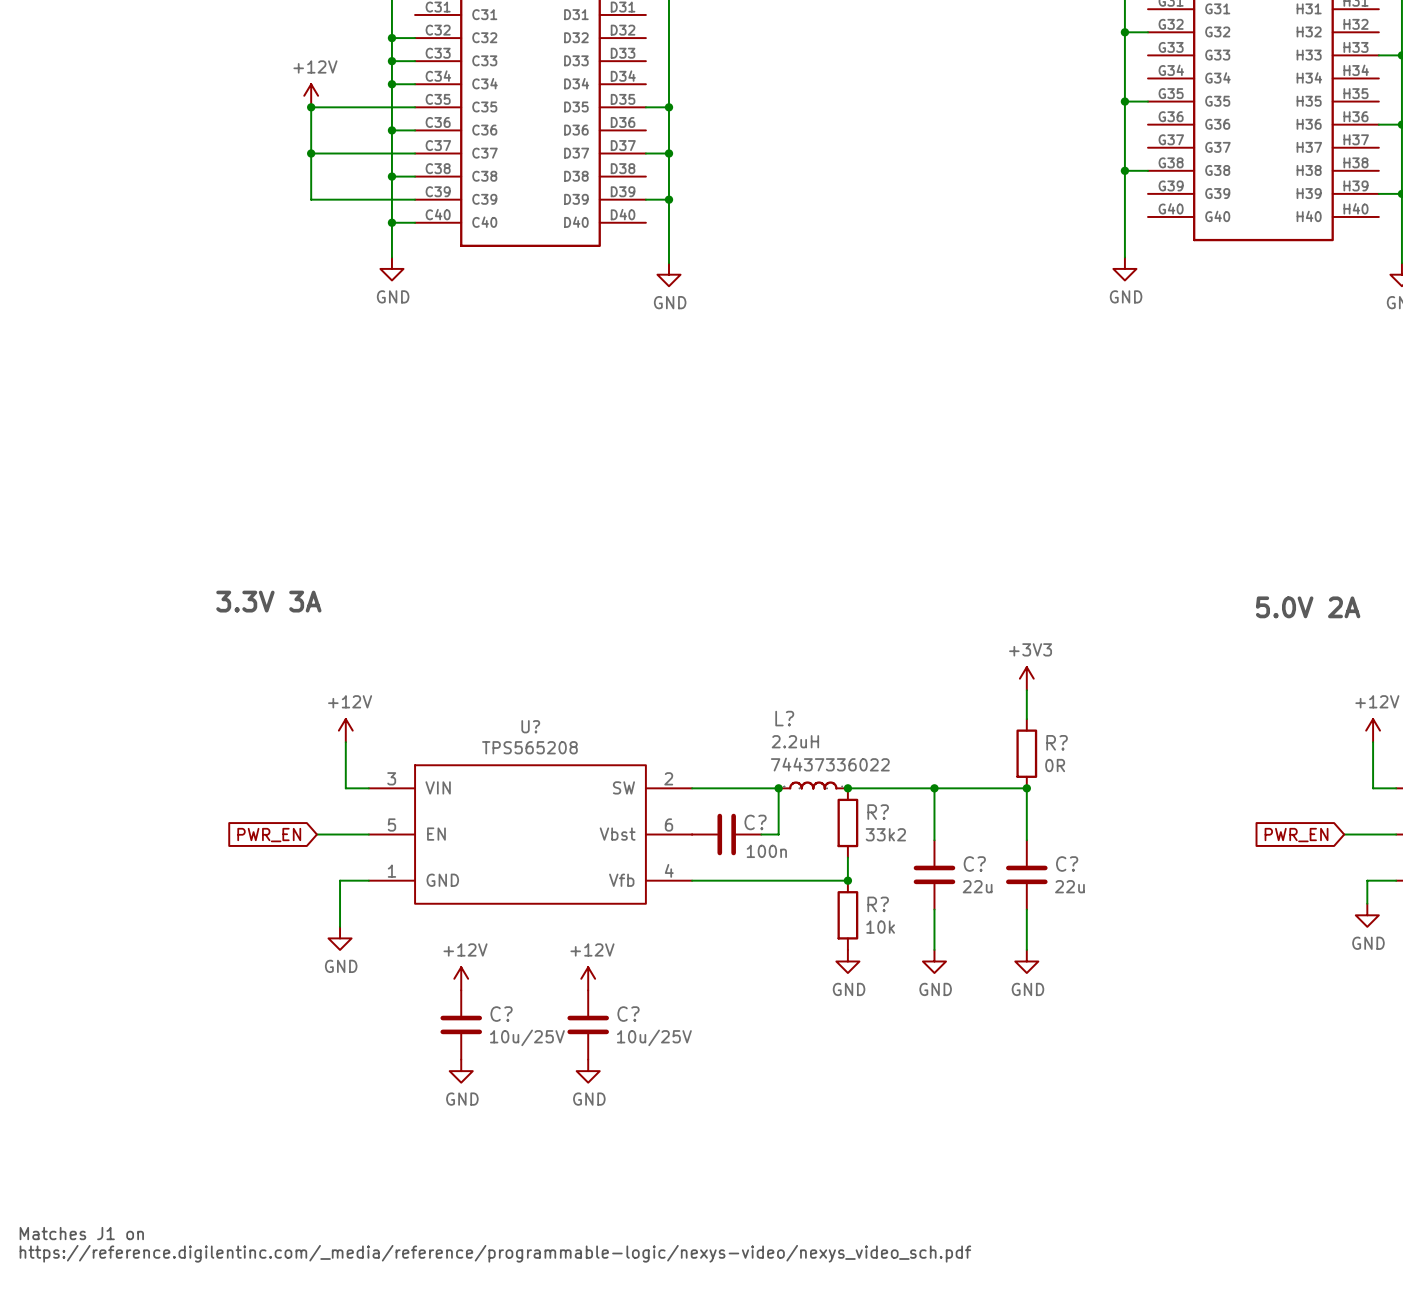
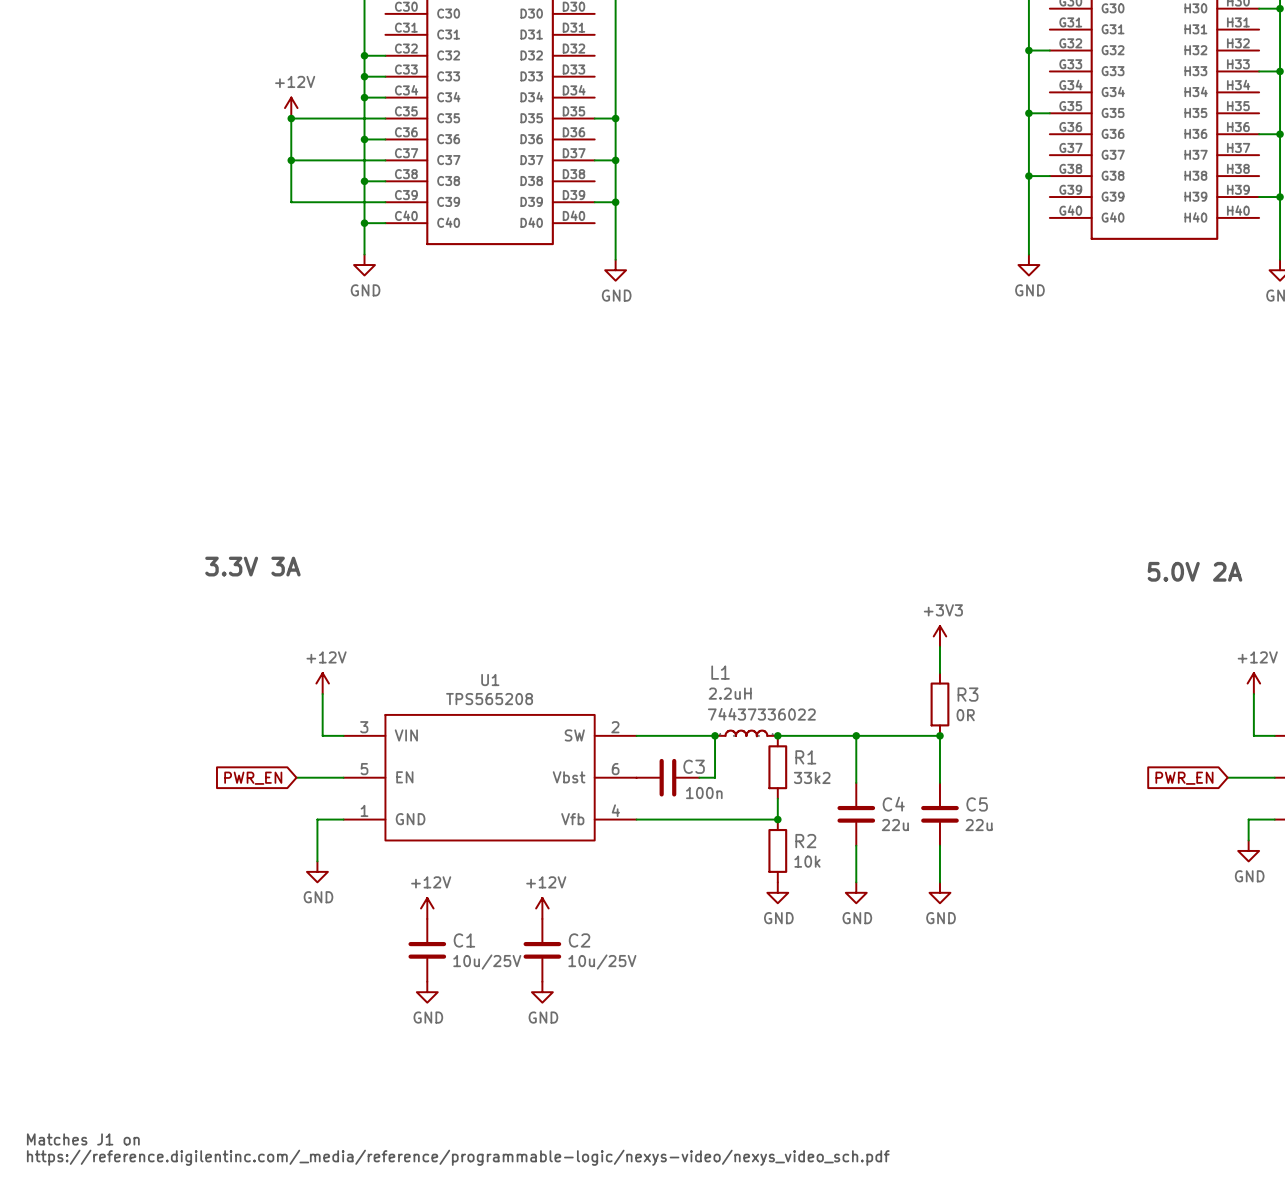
L? name: L? (784, 718) -> L1 (720, 672)
U? name: U? (530, 726) -> U1 (490, 680)
R? name: R? (1057, 742) -> R3 (968, 694)
R? name: R? (878, 812) -> R1 (805, 757)
C? name: C? (755, 822) -> C3 (694, 766)
C? name: C? (974, 864) -> C4 (893, 804)
C? name: C? (1067, 864) -> C5 (977, 804)
R? name: R? (878, 904) -> R2 (805, 841)
C? name: C? (501, 1014) -> C1 (464, 940)
C? name: C? (628, 1014) -> C2 (579, 940)

